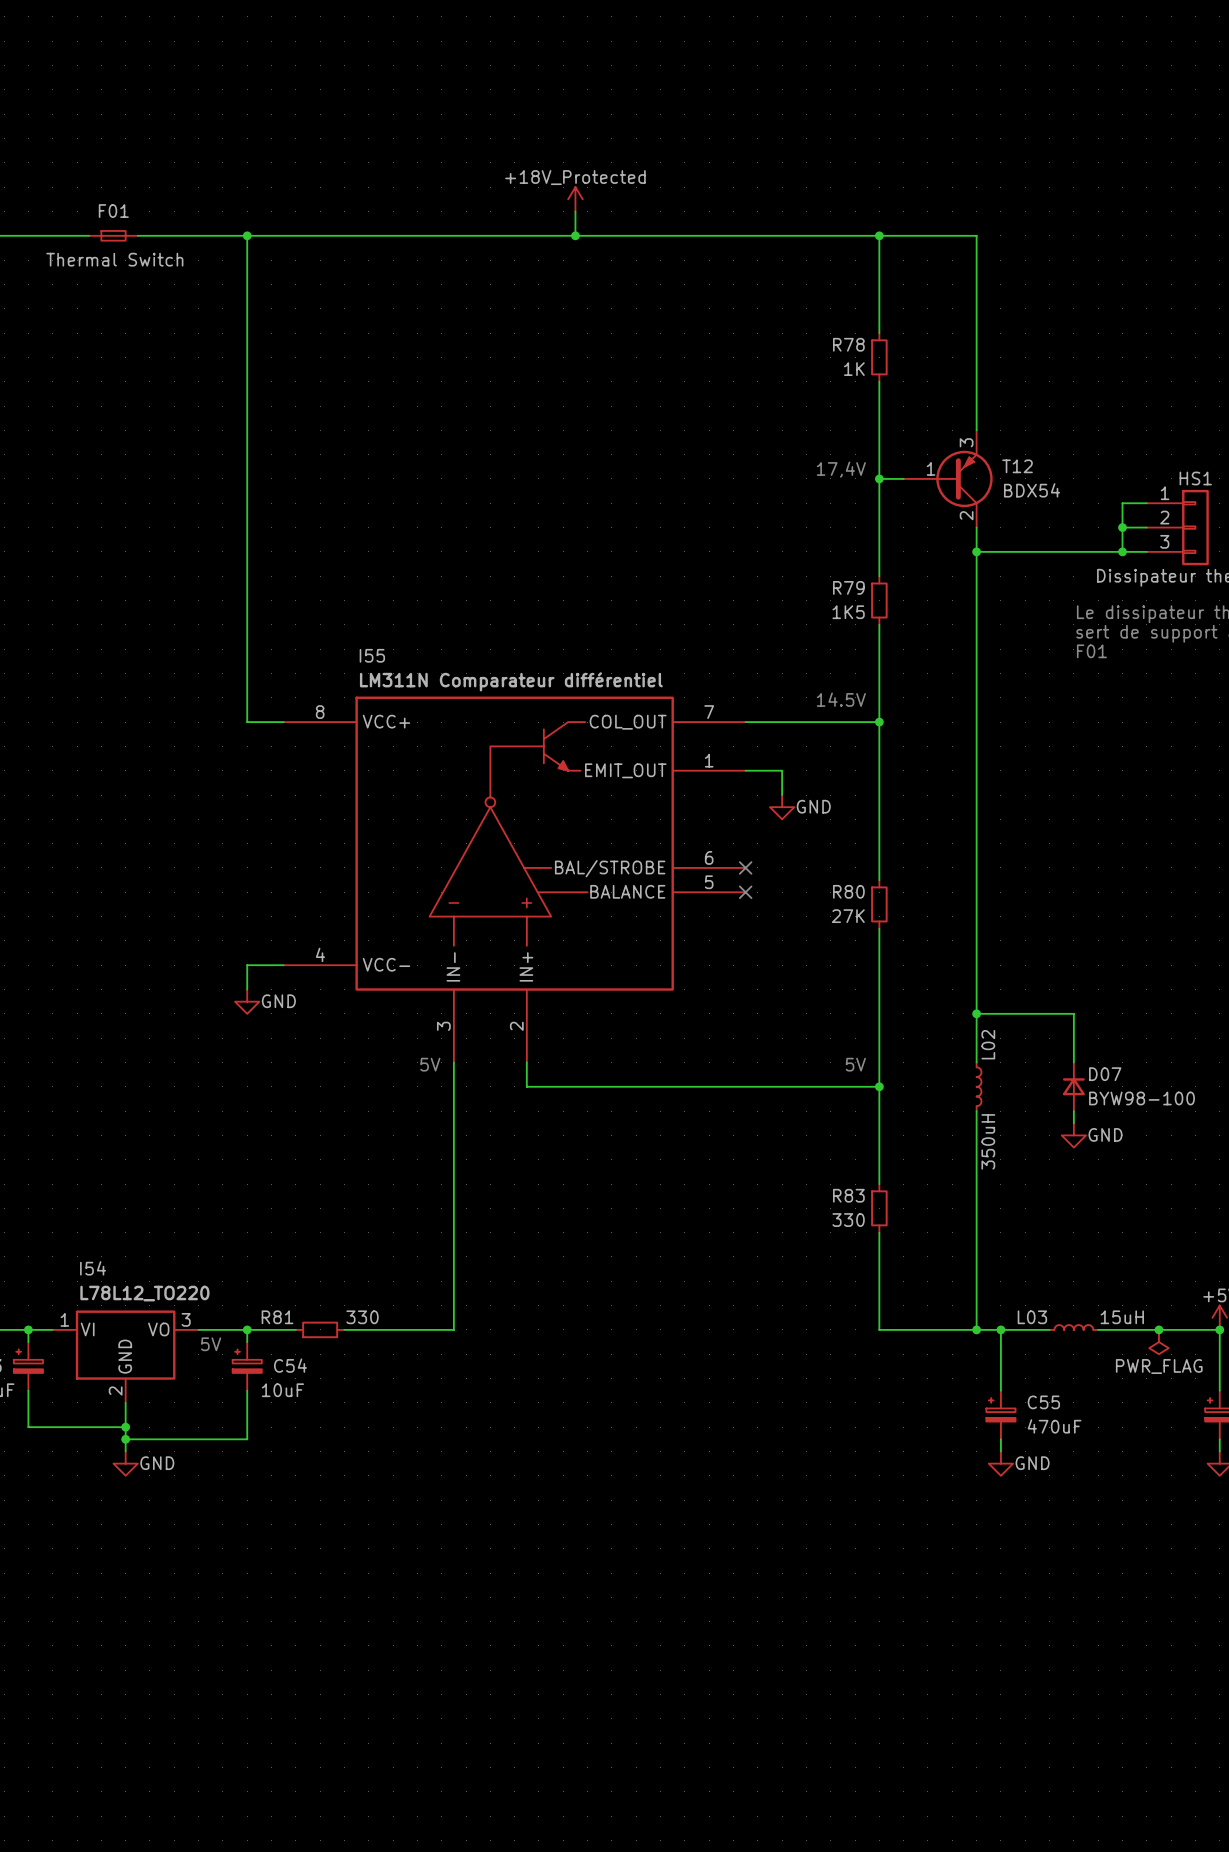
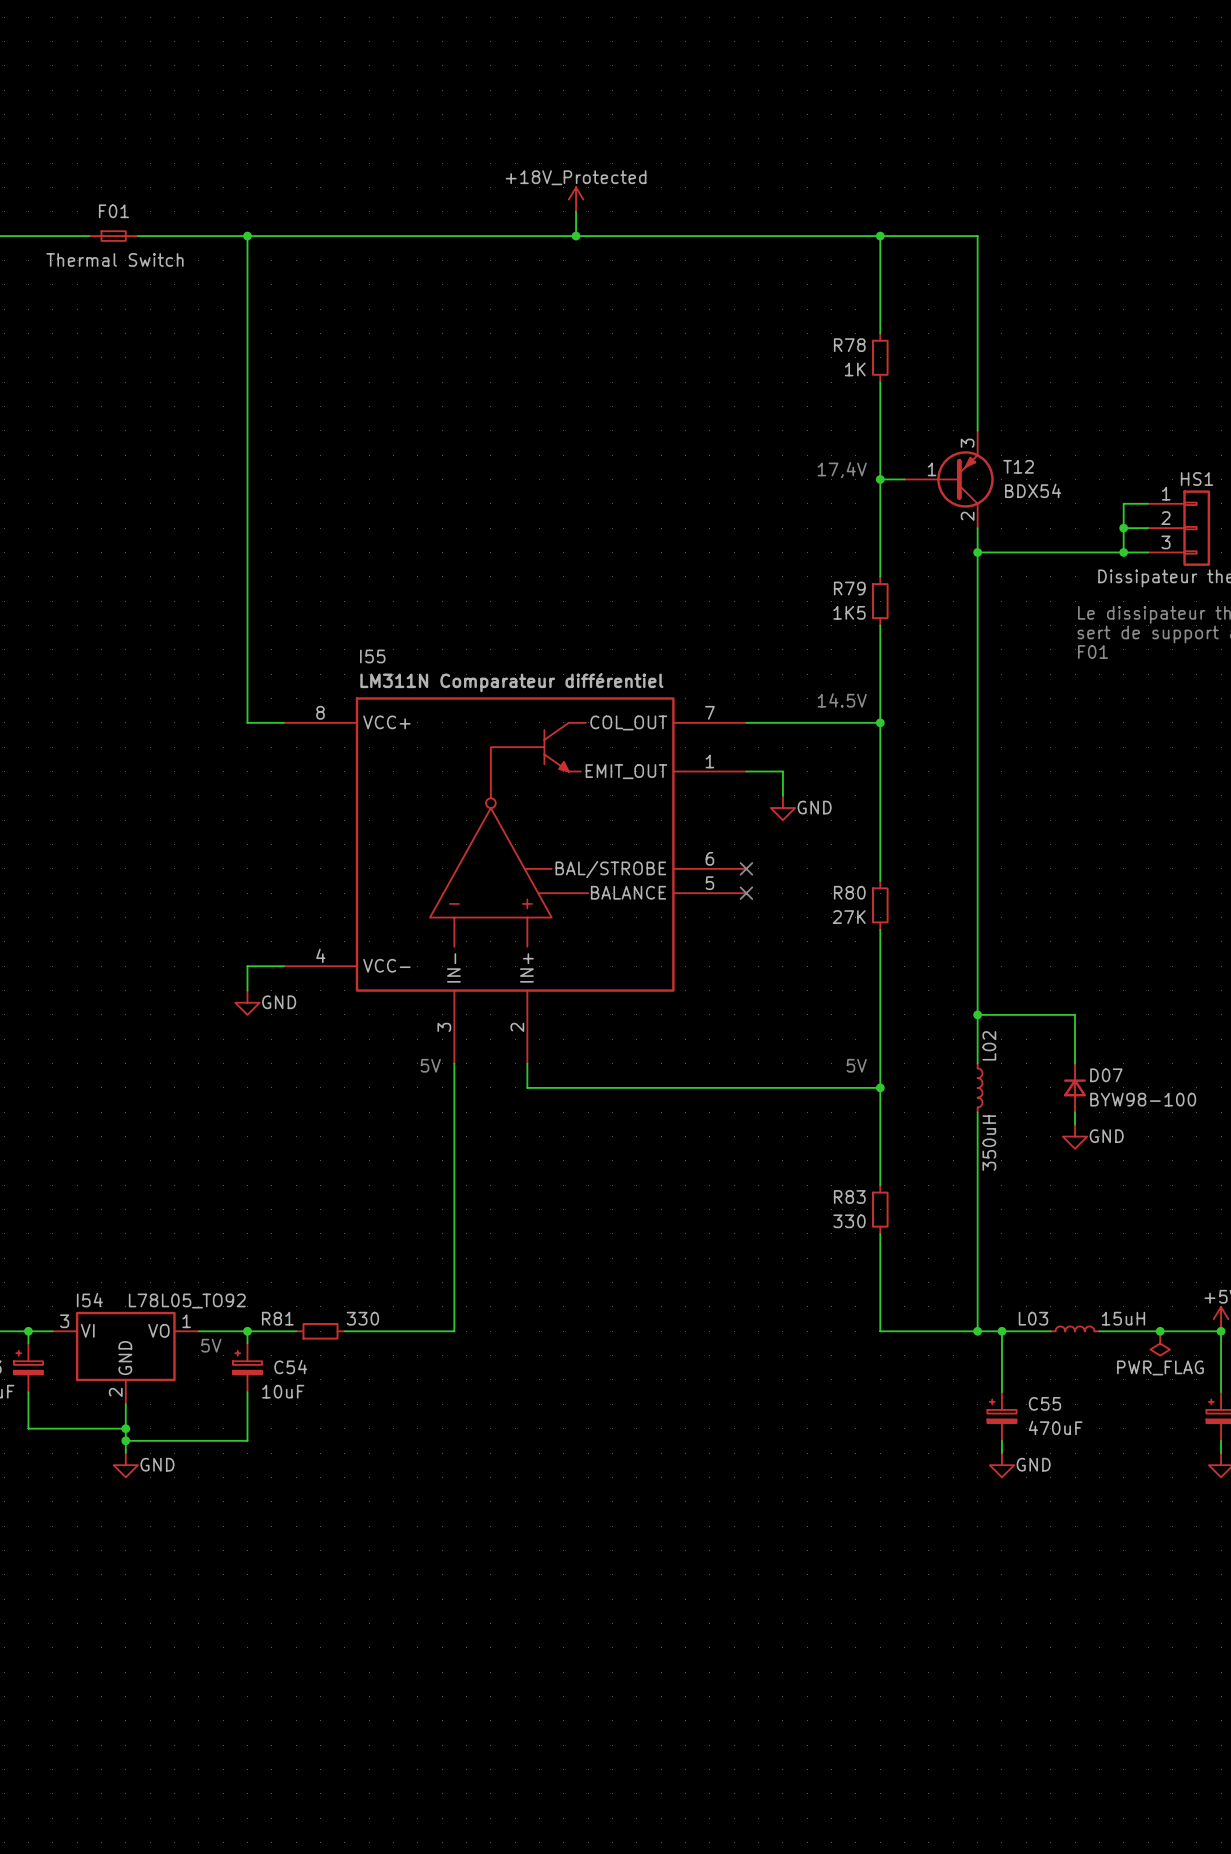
I54 name position: I54 (93, 1268) -> I54 (89, 1300)
I54 value: L78L12_TO220 (144, 1293) -> L78L05_TO92 (187, 1301)
I54 pin number: 1 (64, 1319) -> 3 (64, 1321)
I54 pin number: 3 (186, 1319) -> 1 (186, 1321)

